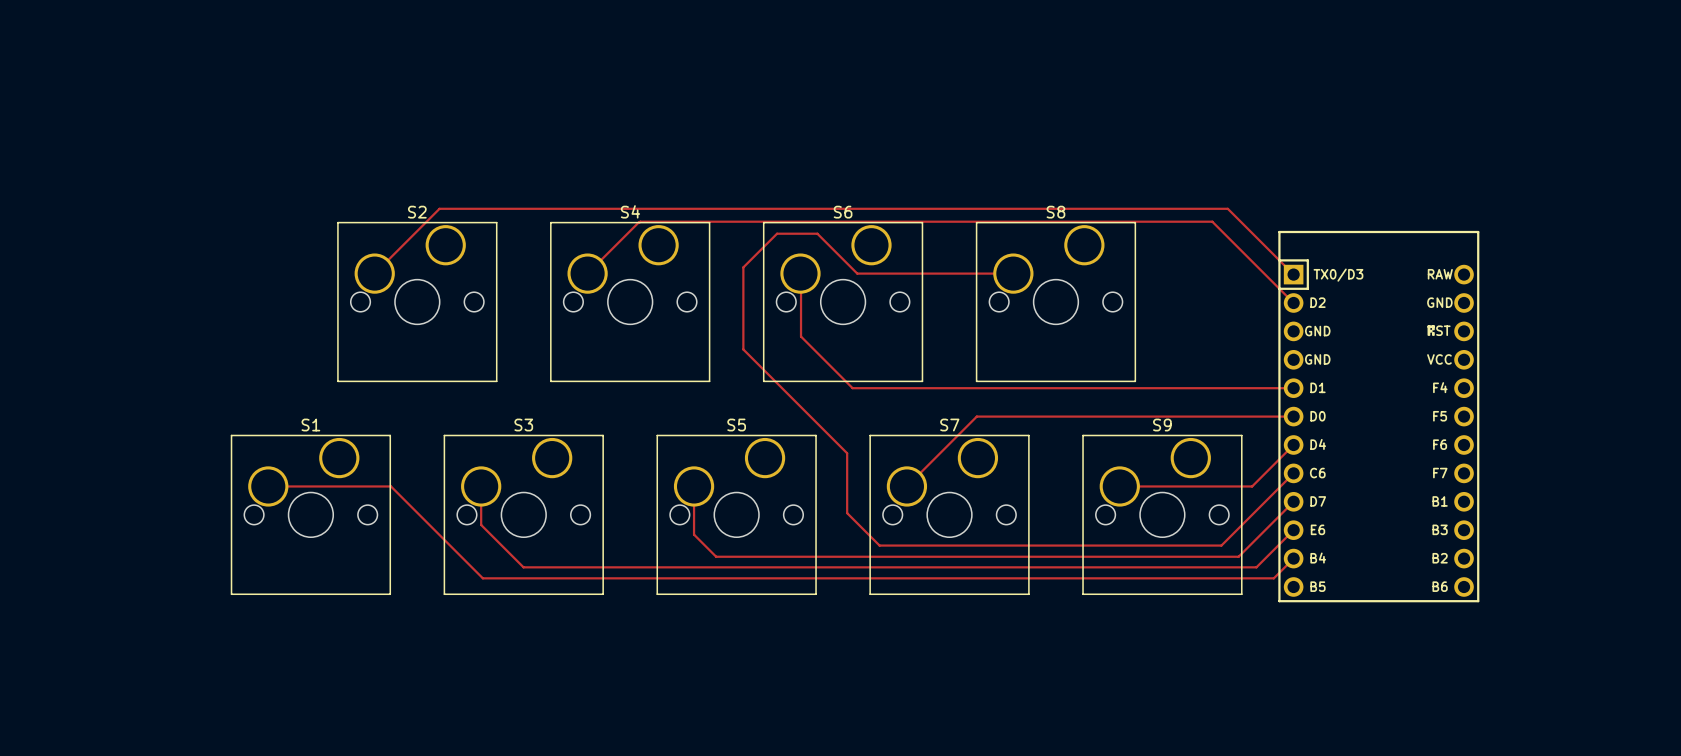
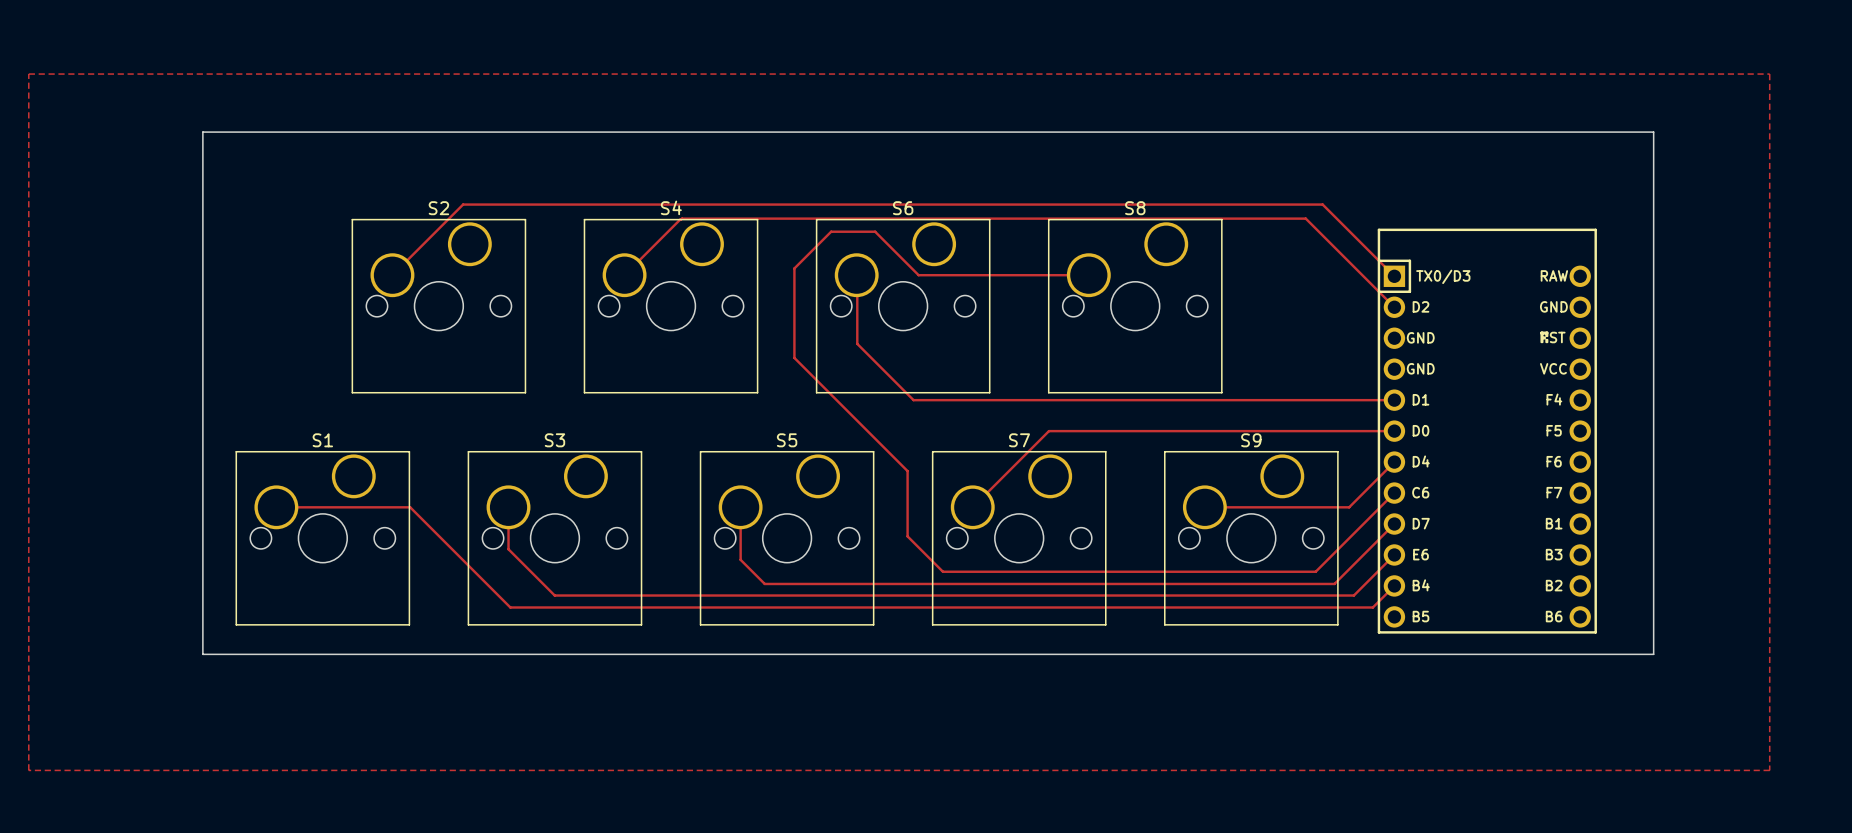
zone outline: none -> (28, 74) (1769, 74) (1769, 770) (28, 770) (28, 74)
board edge: none -> (202, 132) (1653, 132) (1653, 654) (202, 654) (202, 132)

